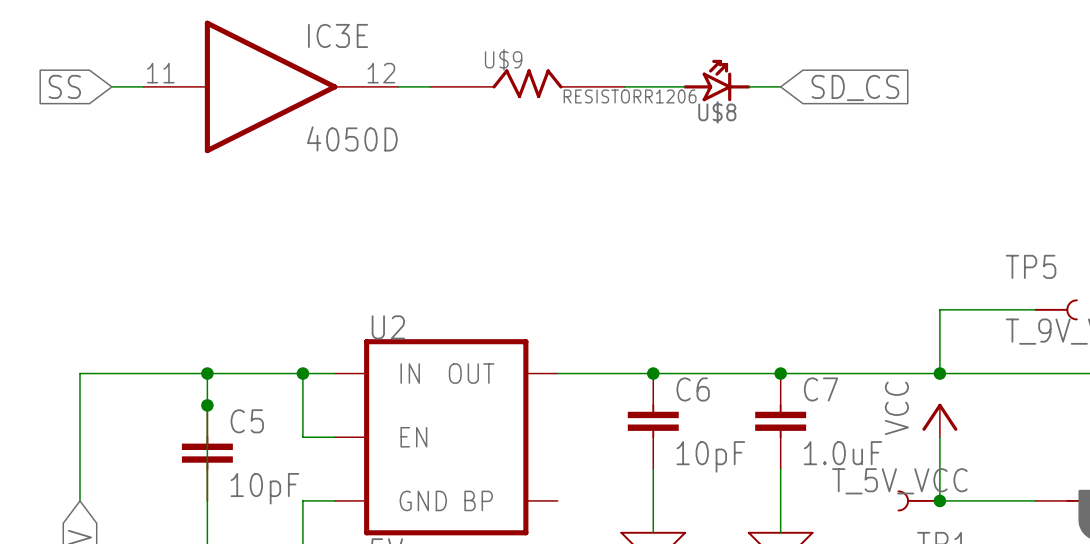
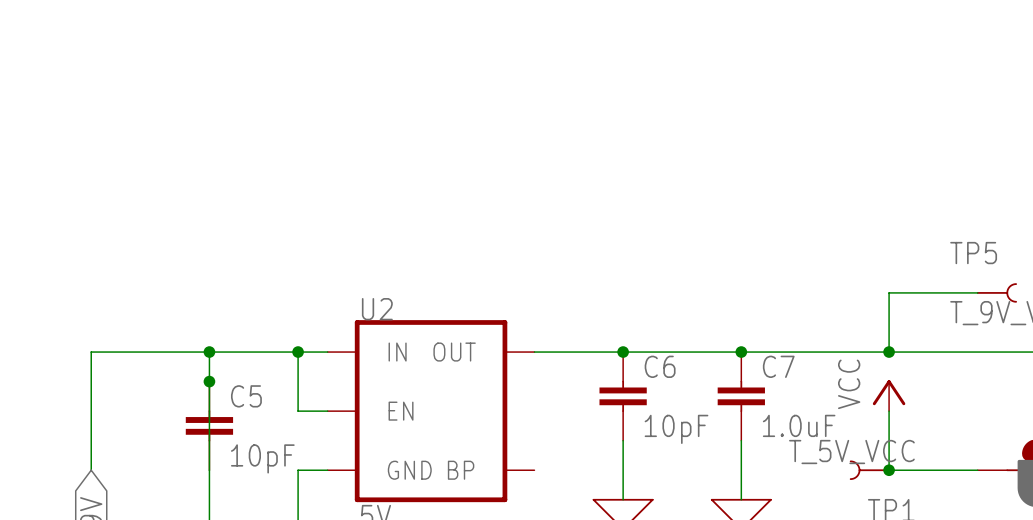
U$8: (716, 80) -> none
U$9: RESISTORR1206 (527, 83) -> none
global label: SS (64, 86) -> none
wire: (111, 86) (143, 86) -> none
IC3E: 4050D (271, 86) -> none
wire: (398, 86) (430, 86) -> none
wire: (624, 86) (685, 86) -> none
wire: (748, 86) (780, 86) -> none
global label: SD_CS (855, 87) -> none

